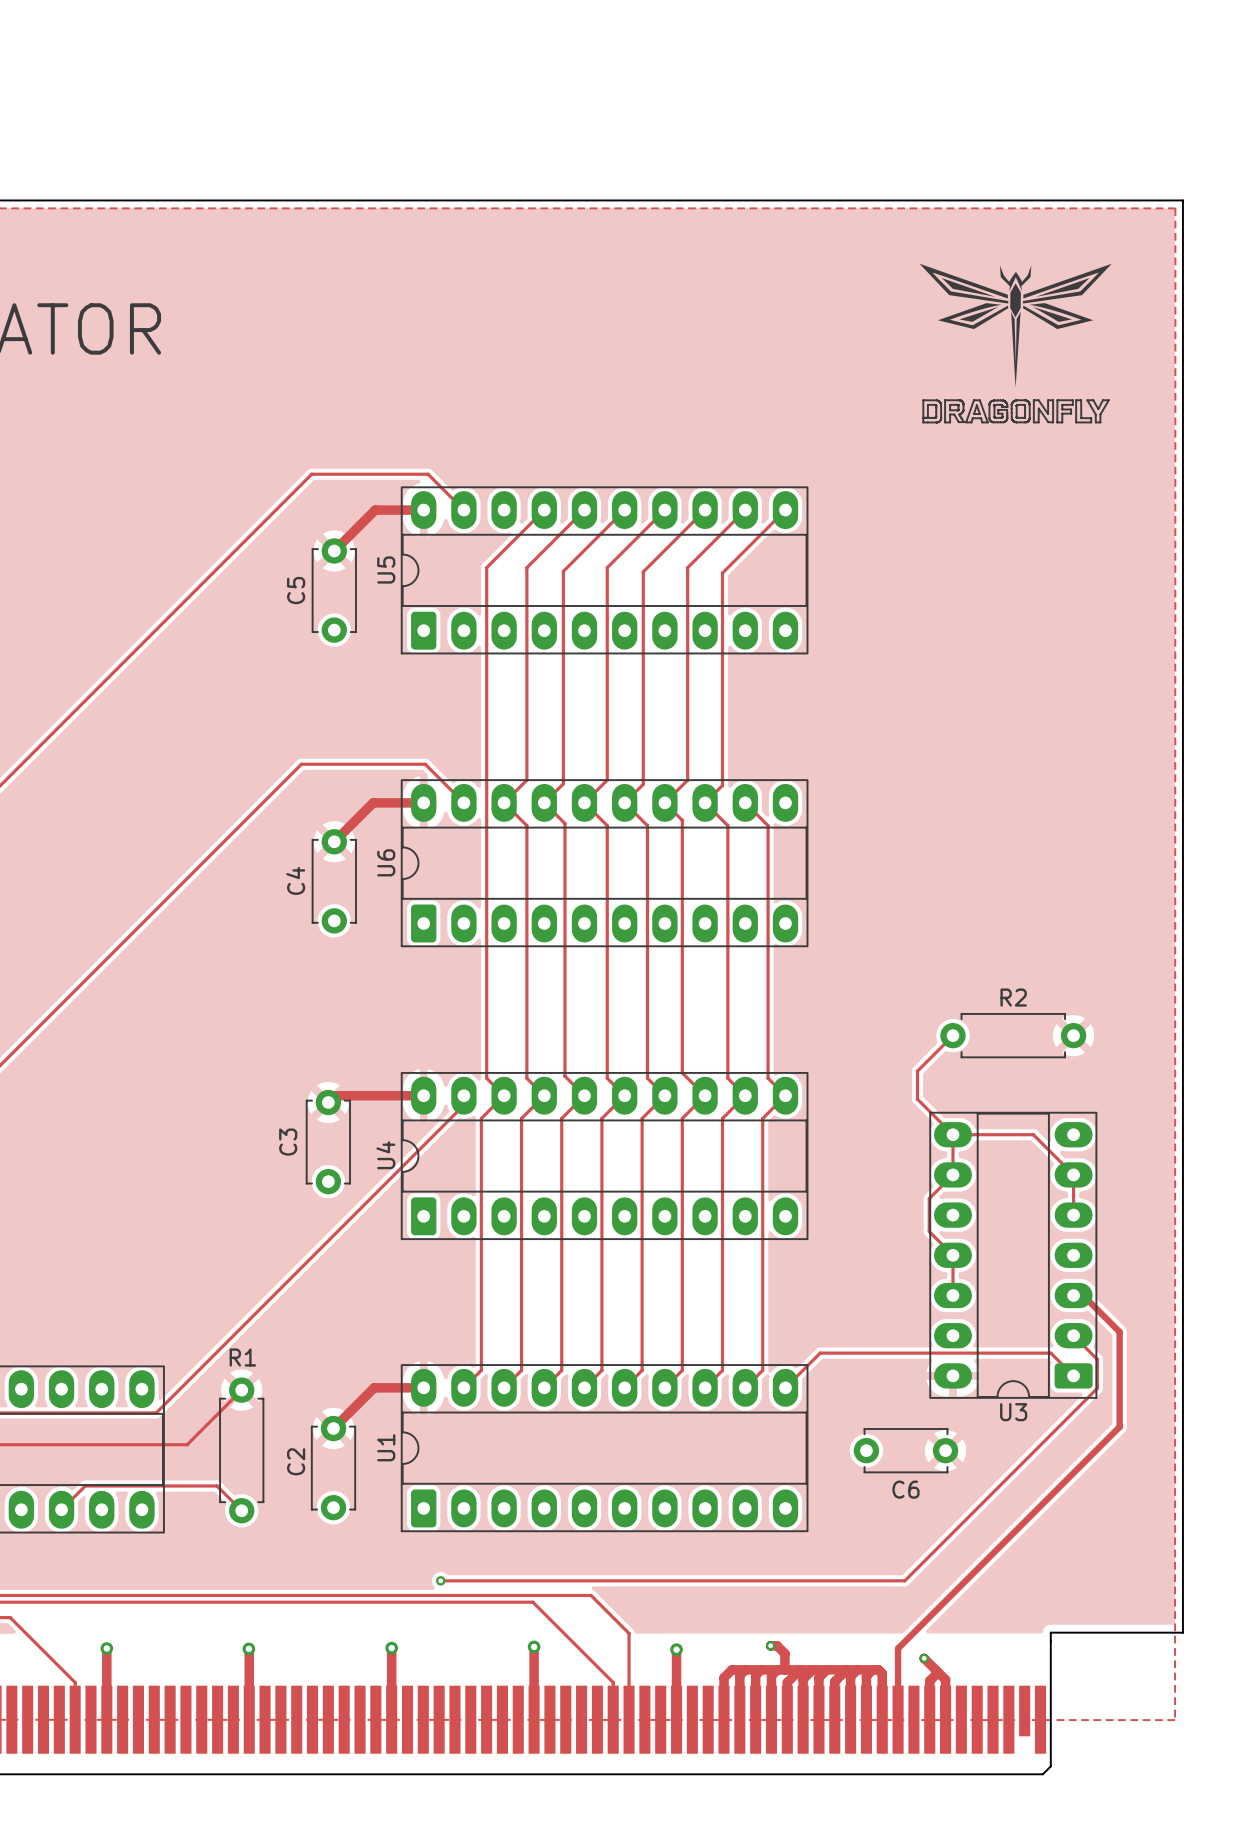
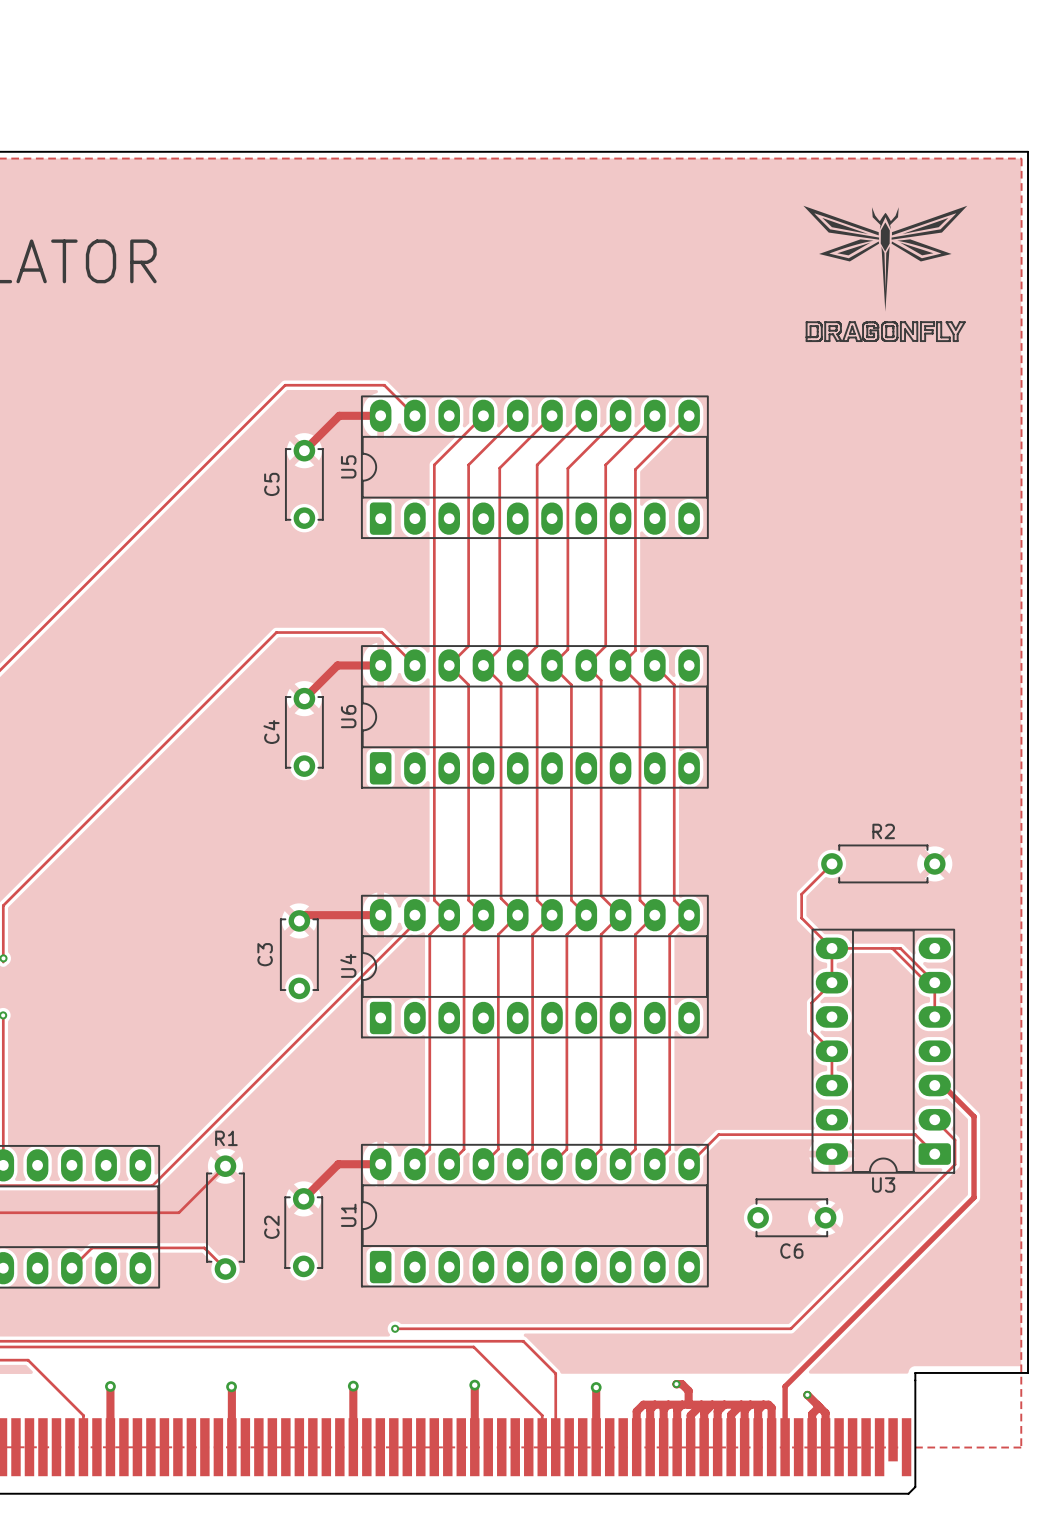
track: none -> (892, 948) (934, 990)

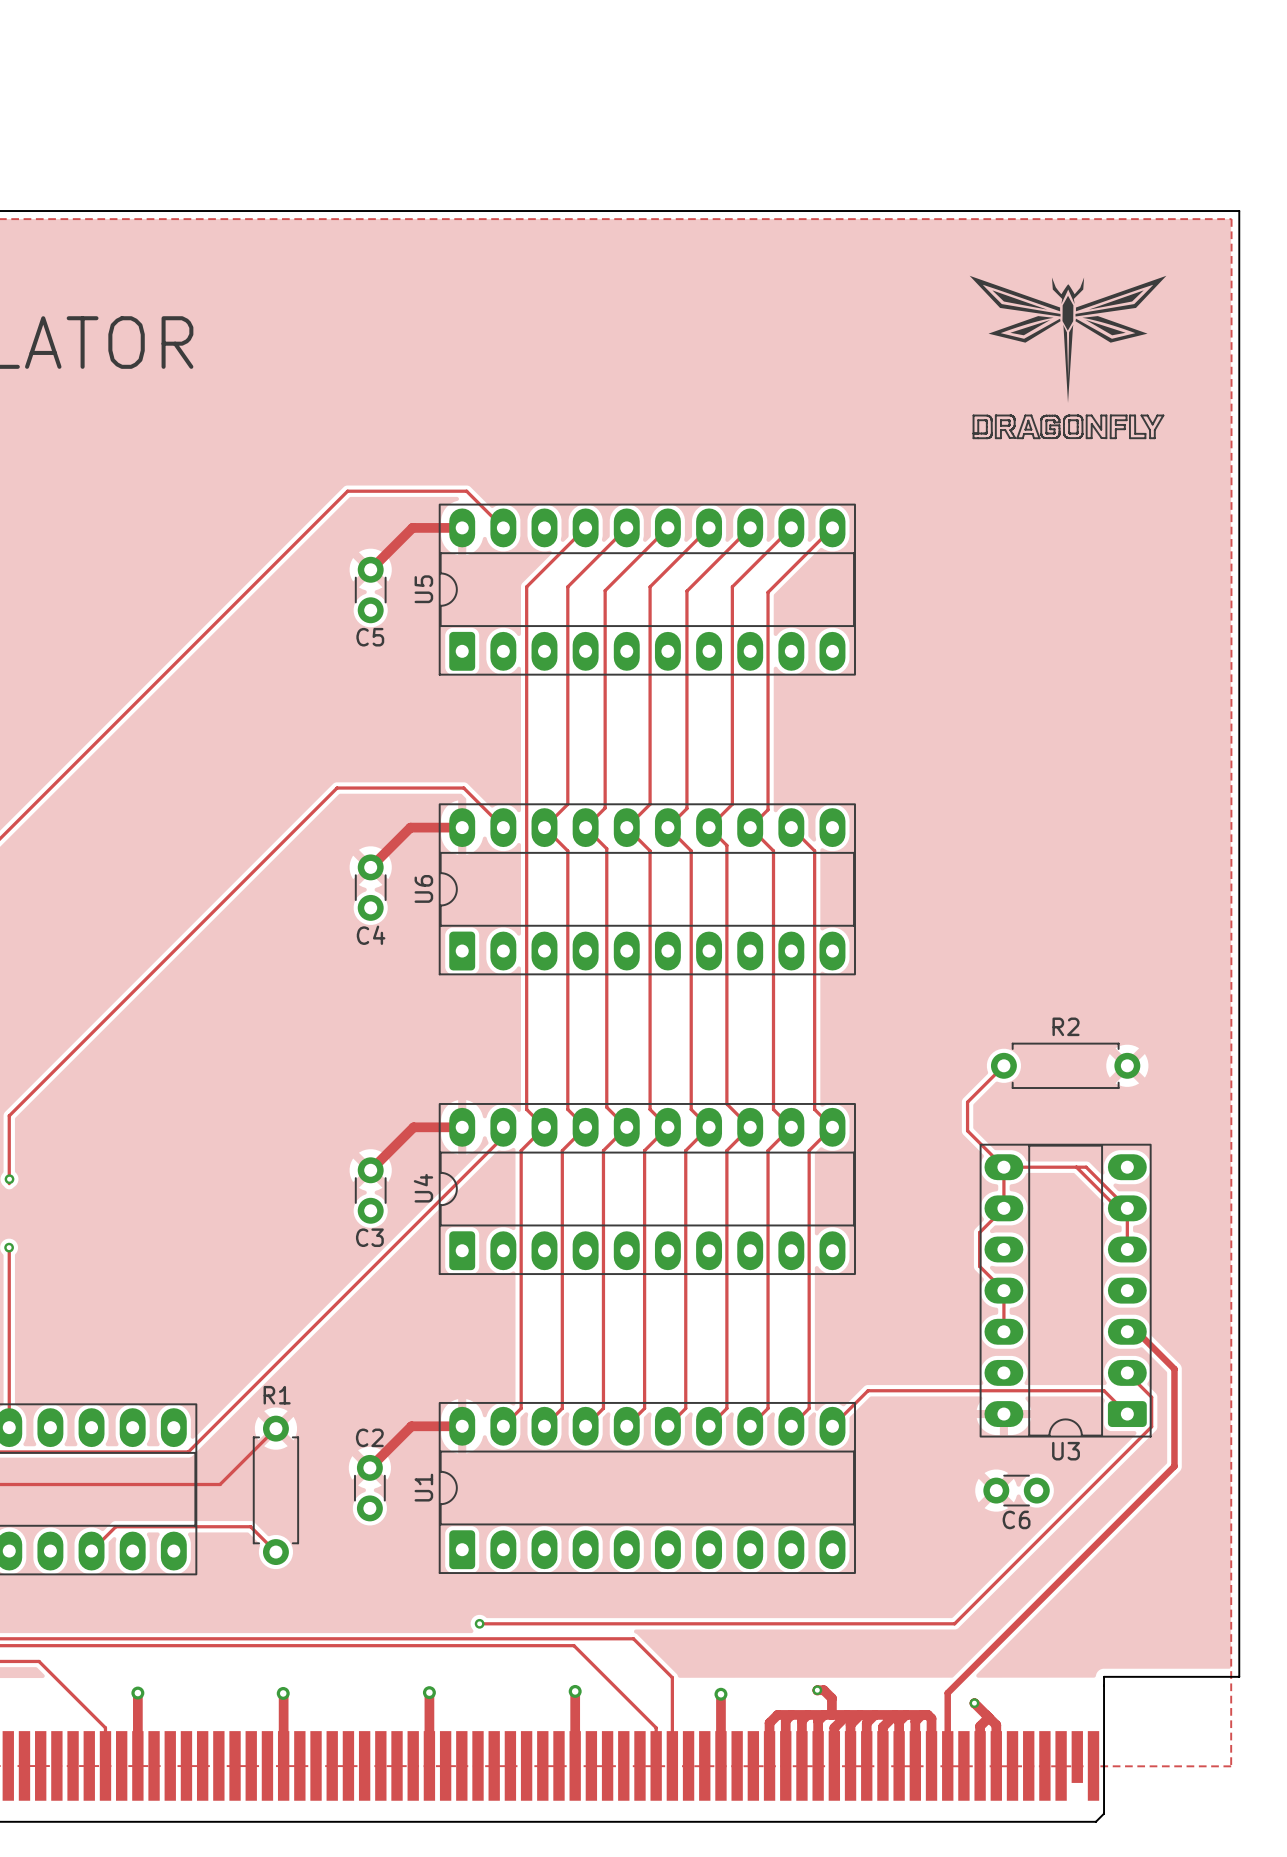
C5 footprint: [285, 439, 324, 529] -> [354, 556, 387, 624]
C5 name position: C5 (271, 484) -> C5 (370, 637)
C4 footprint: [285, 687, 324, 777] -> [354, 854, 387, 921]
C4 name position: C4 (271, 732) -> C4 (371, 935)
C3 footprint: [280, 910, 319, 1000] -> [354, 1157, 387, 1224]
track: (340, 915) (305, 915) (299, 920) -> (413, 1127) (370, 1170)
C3 name position: C3 (265, 954) -> C3 (369, 1237)
C2 footprint: [284, 1188, 324, 1278] -> [354, 1454, 386, 1522]
C6 footprint: [747, 1198, 837, 1238] -> [983, 1474, 1050, 1507]
C2 name position: C2 (271, 1227) -> C2 (369, 1437)

